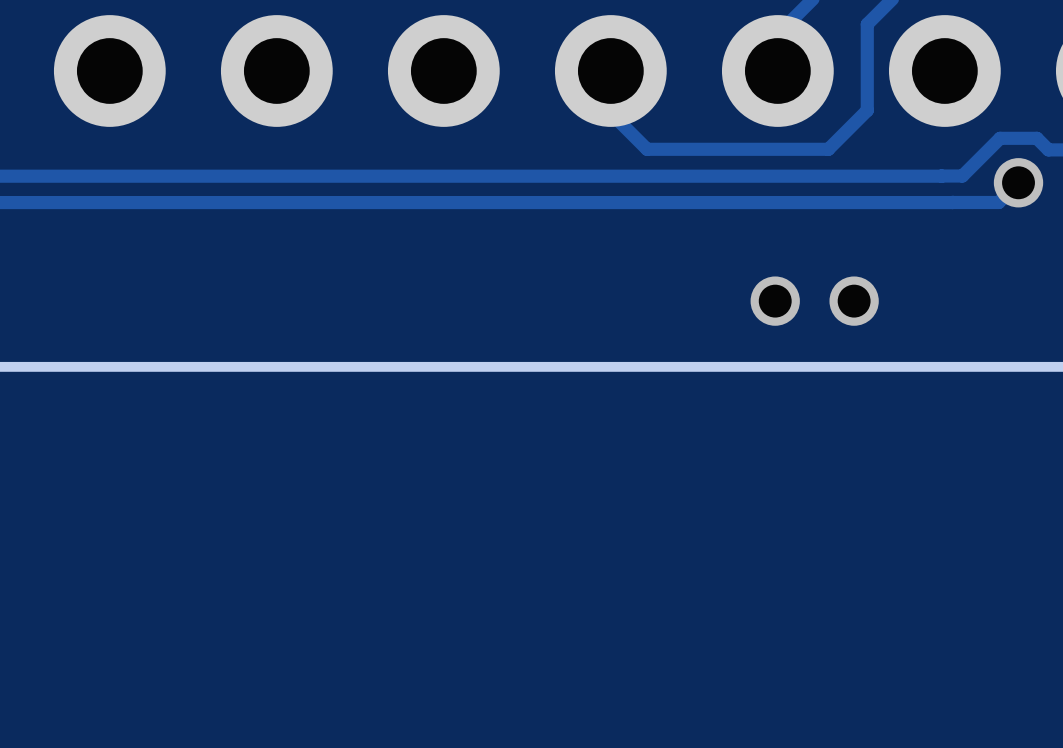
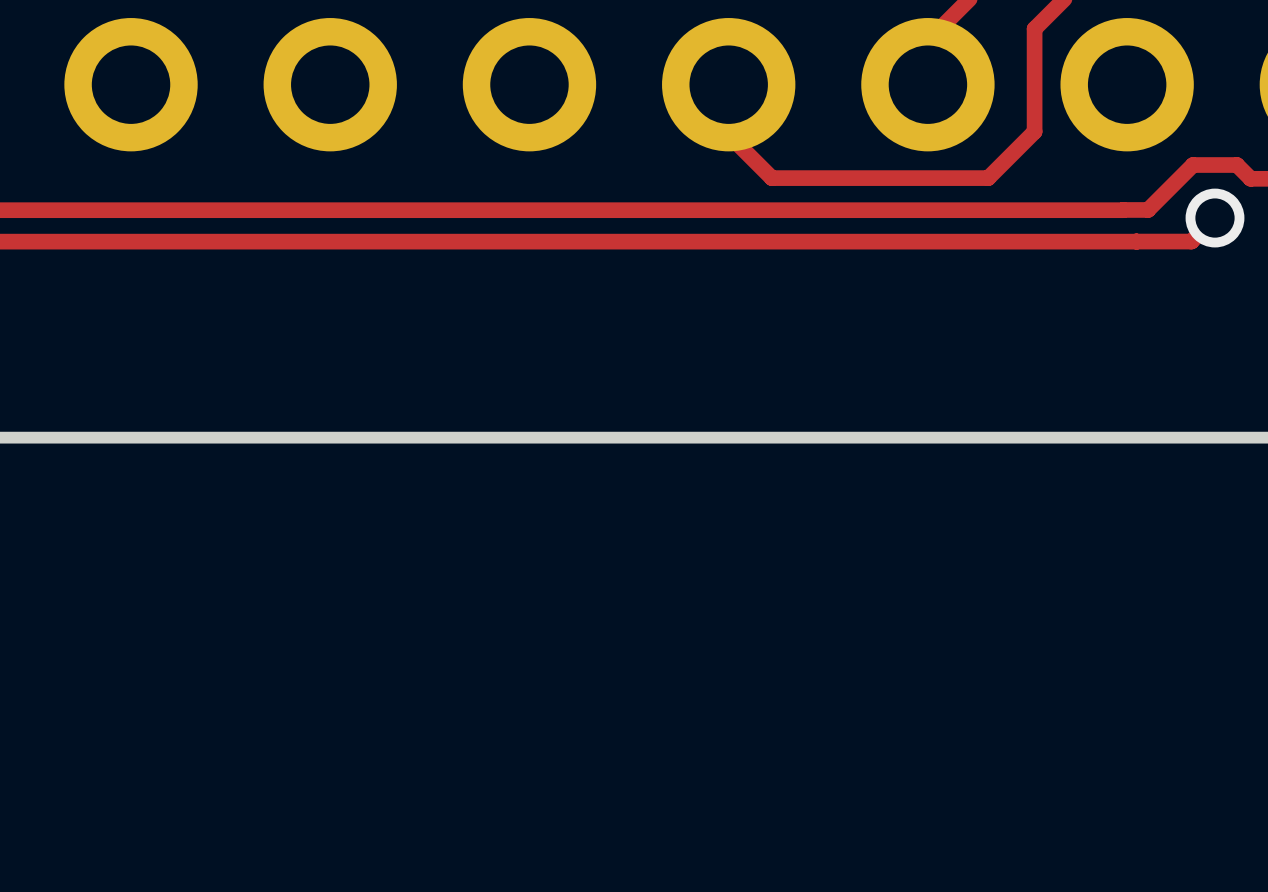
via: (775, 301) -> none
via: (854, 301) -> none

